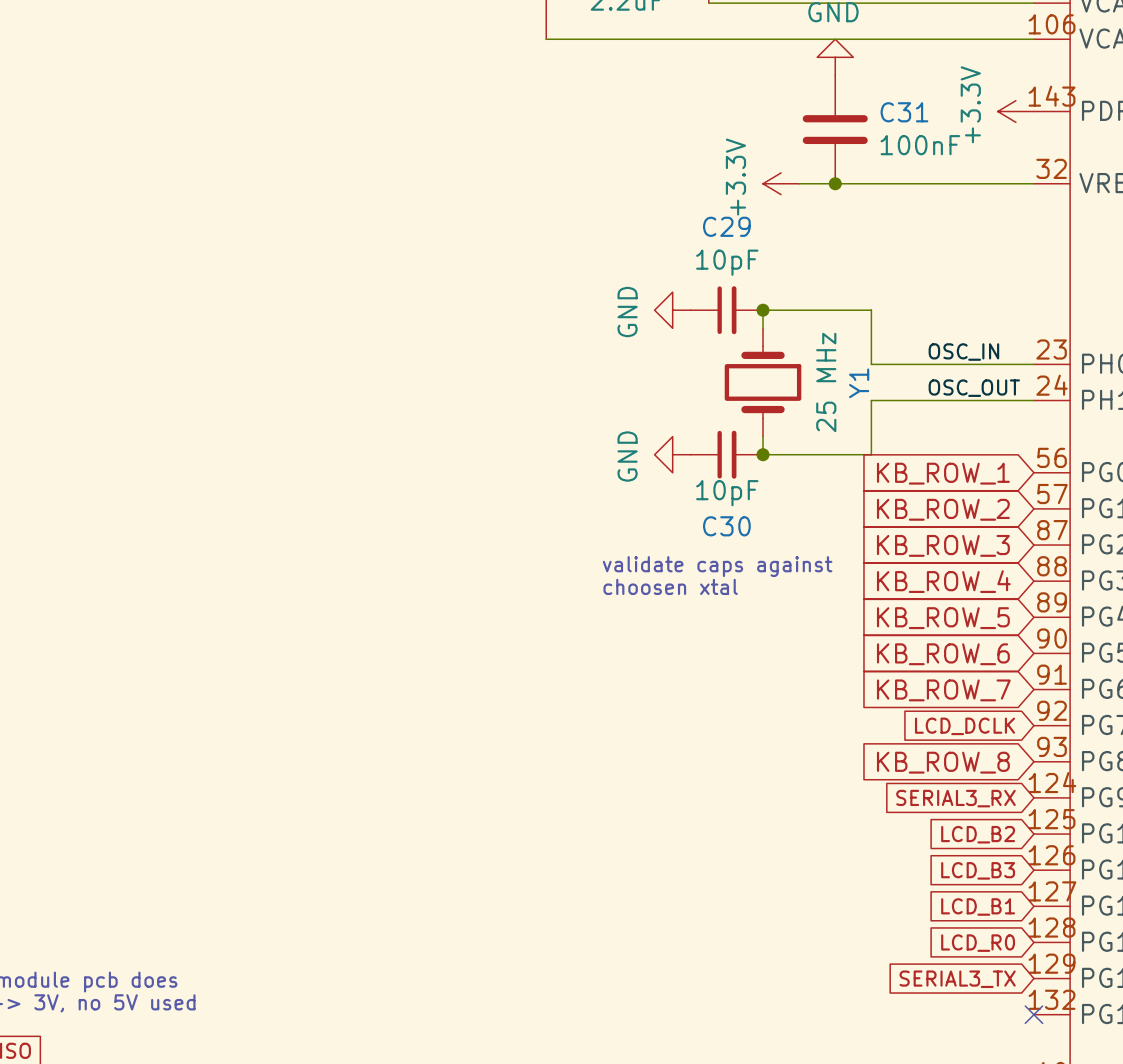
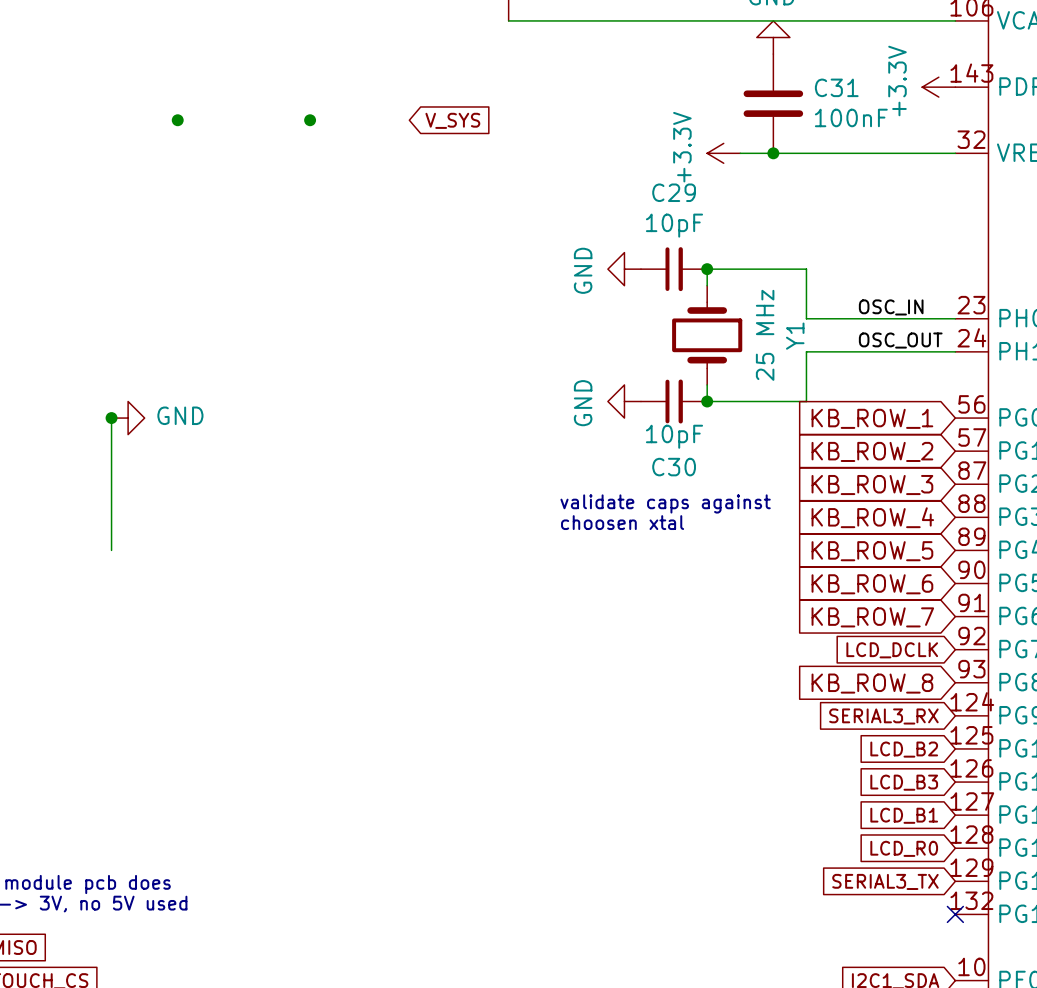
junction: none -> (177, 120)
junction: none -> (310, 120)
global label: none -> V_SYS (452, 120)
wire: none -> (111, 418) (111, 550)
junction: none -> (111, 418)
power symbol: none -> GND (128, 418)

